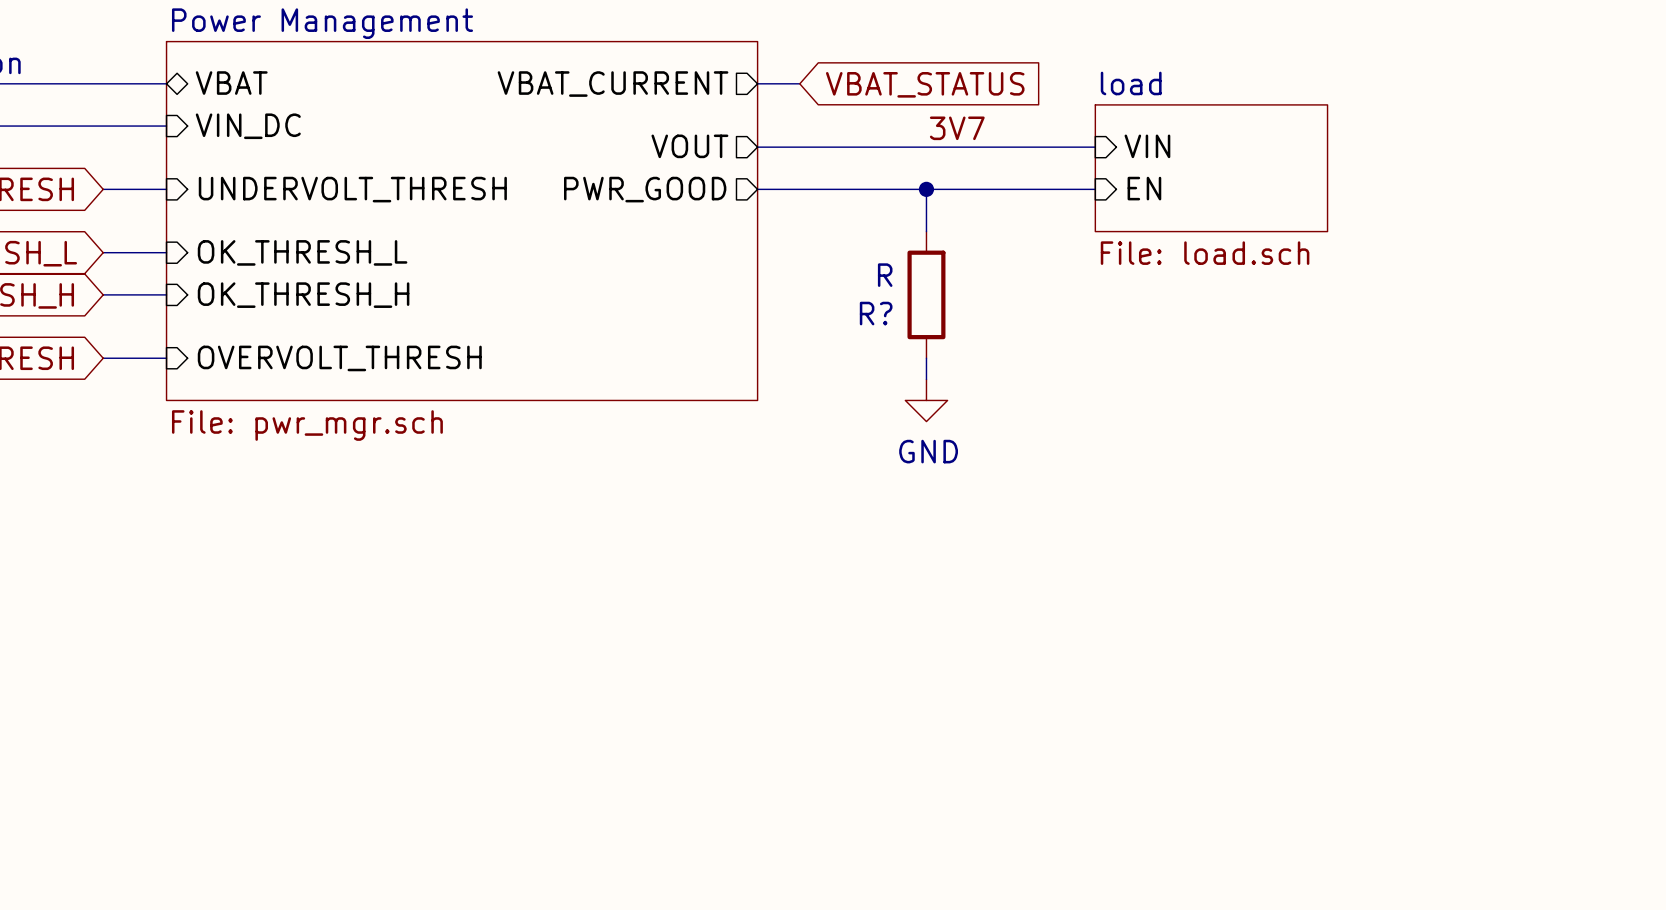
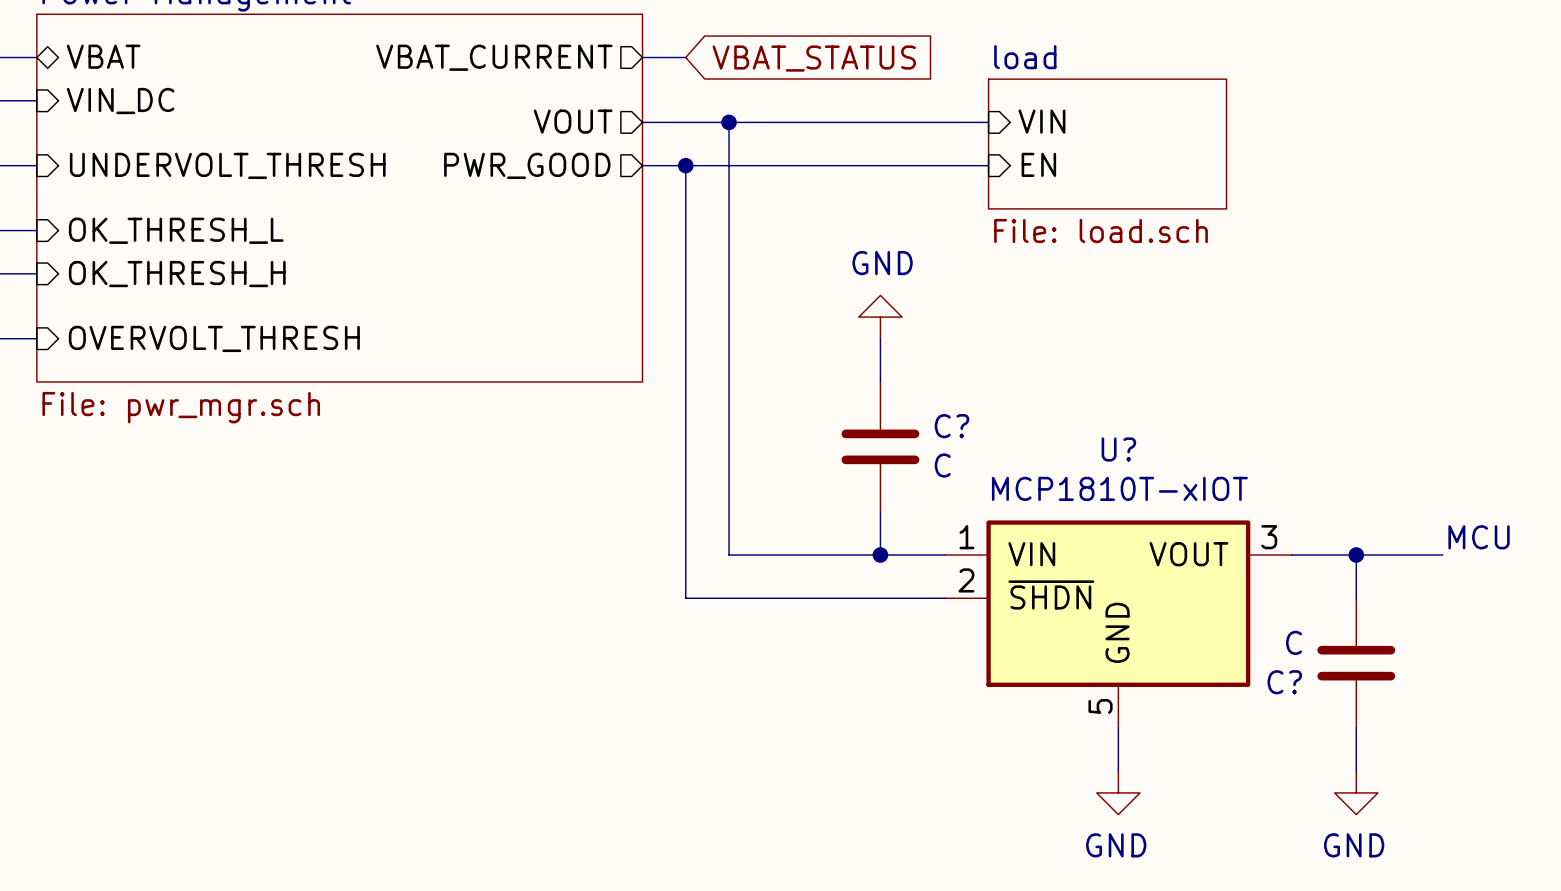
label: 3V7 (957, 128) -> none
wire: none -> (729, 122) (729, 555) (945, 555)
junction: none -> (729, 122)
wire: none -> (685, 165) (685, 598) (945, 598)
junction: none -> (685, 165)
wire: (926, 189) (926, 231) -> (880, 338) (880, 381)
junction: (926, 189) -> none
R?: R (926, 294) -> none
wire: (926, 358) (926, 379) -> none
power symbol rotation: 0° (926, 400) -> 180° (880, 317)
power symbol position: GND (926, 400) -> GND (880, 317)
C?: none -> C (880, 446)
wire: none -> (880, 511) (880, 555)
text: none -> MCU (1479, 537)
junction: none -> (880, 555)
wire: none -> (1291, 555) (1442, 555)
wire: none -> (1356, 555) (1356, 598)
junction: none -> (1356, 555)
U?: none -> MCP1810T-xIOT (1118, 624)
C?: none -> C (1356, 663)
wire: none -> (1118, 728) (1118, 771)
wire: none -> (1356, 728) (1356, 771)
power symbol: none -> GND (1118, 792)
power symbol: none -> GND (1356, 792)

